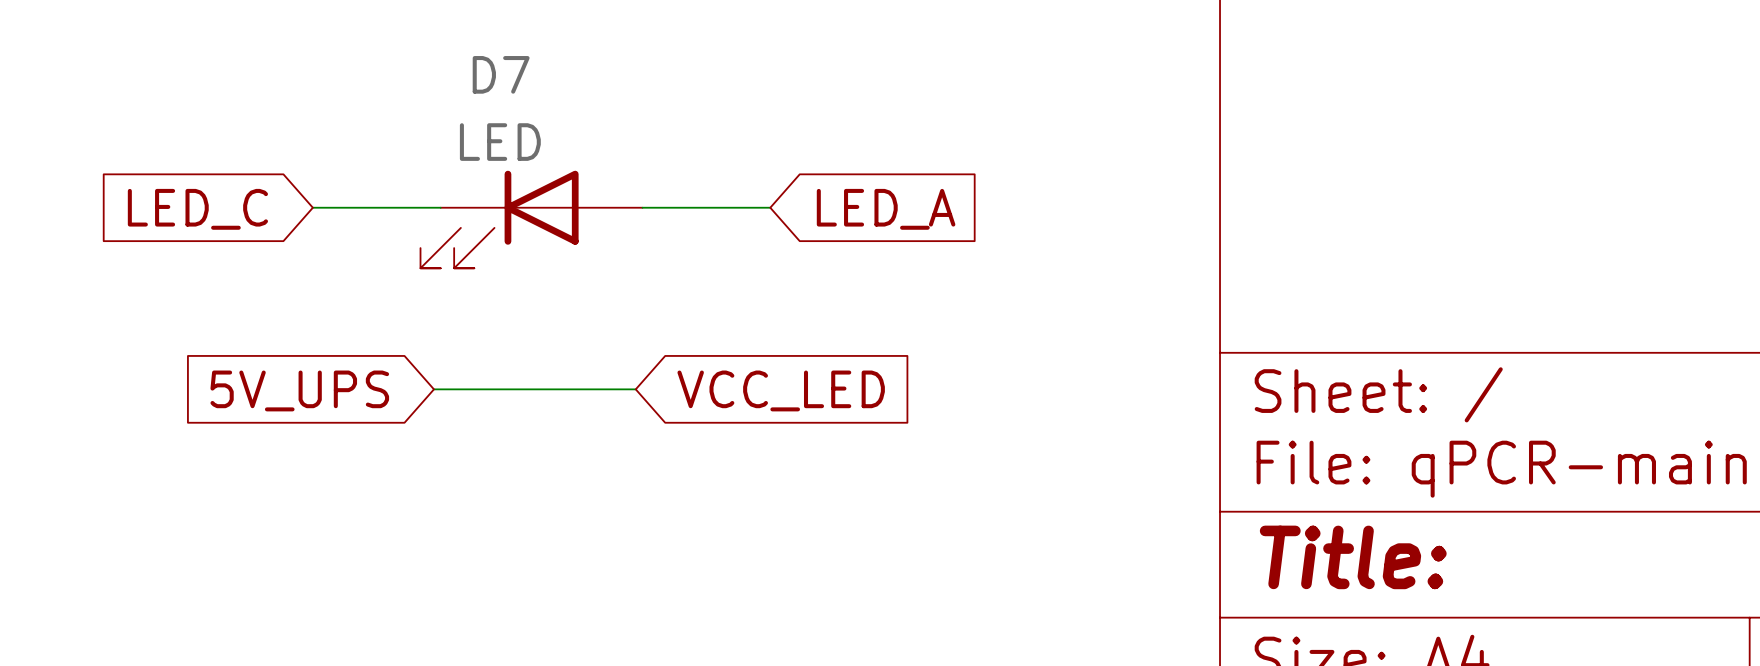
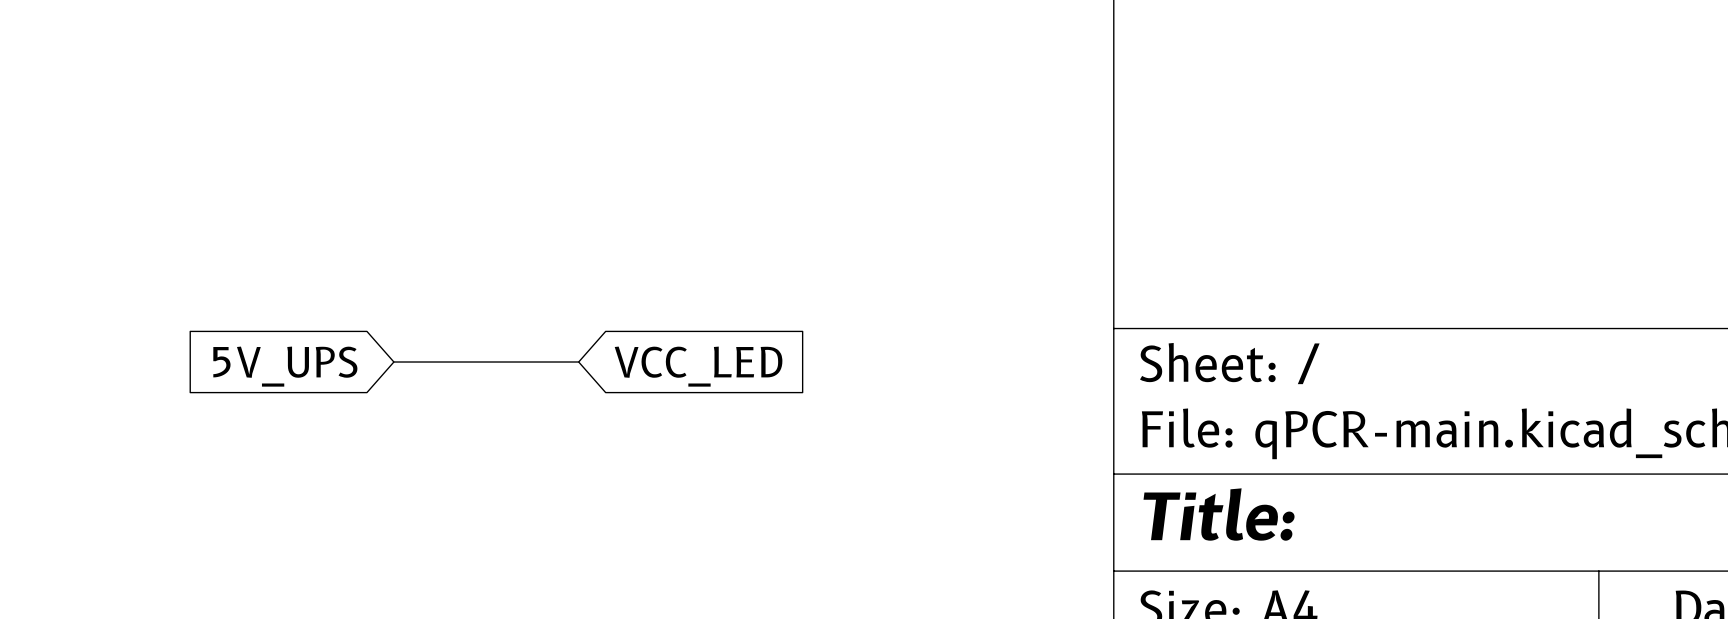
wire: (312, 207) (440, 207) -> none
wire: (642, 207) (770, 207) -> none
global label: LED_C (197, 209) -> none
global label: LED_A (886, 209) -> none
D7: LED (531, 219) -> none

